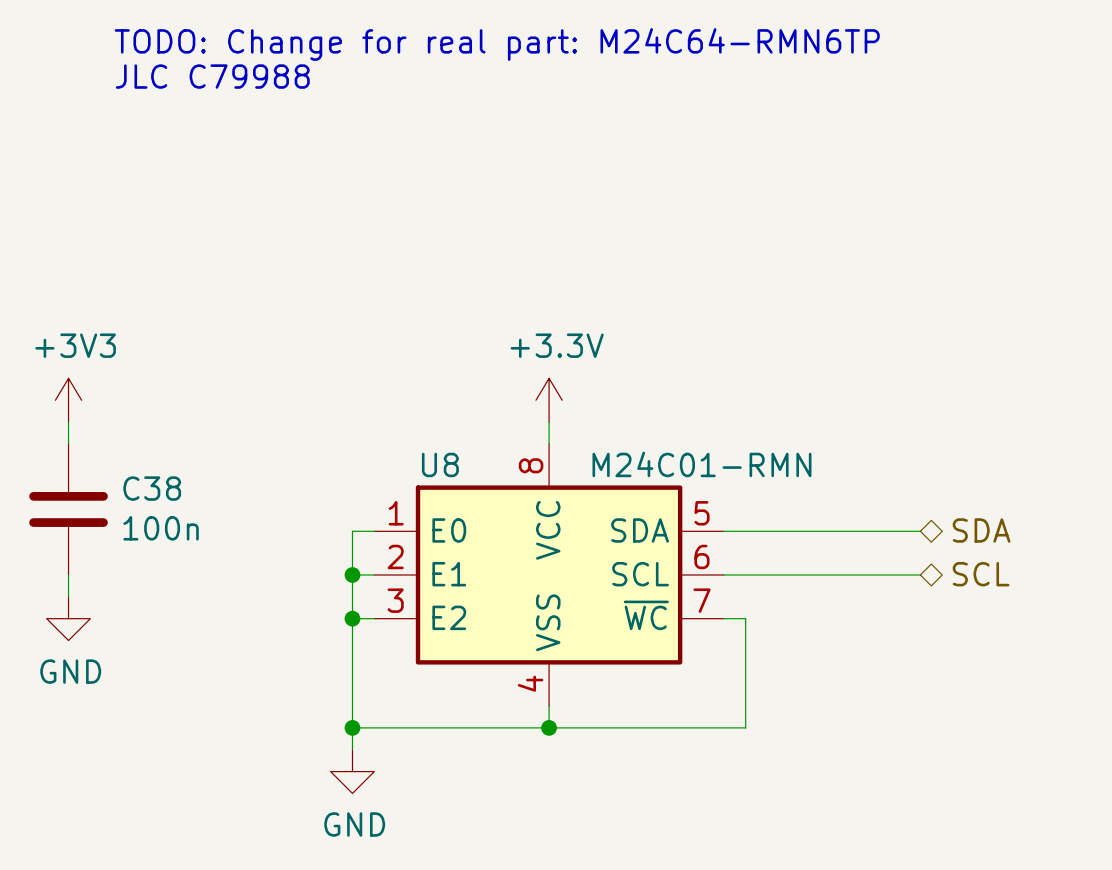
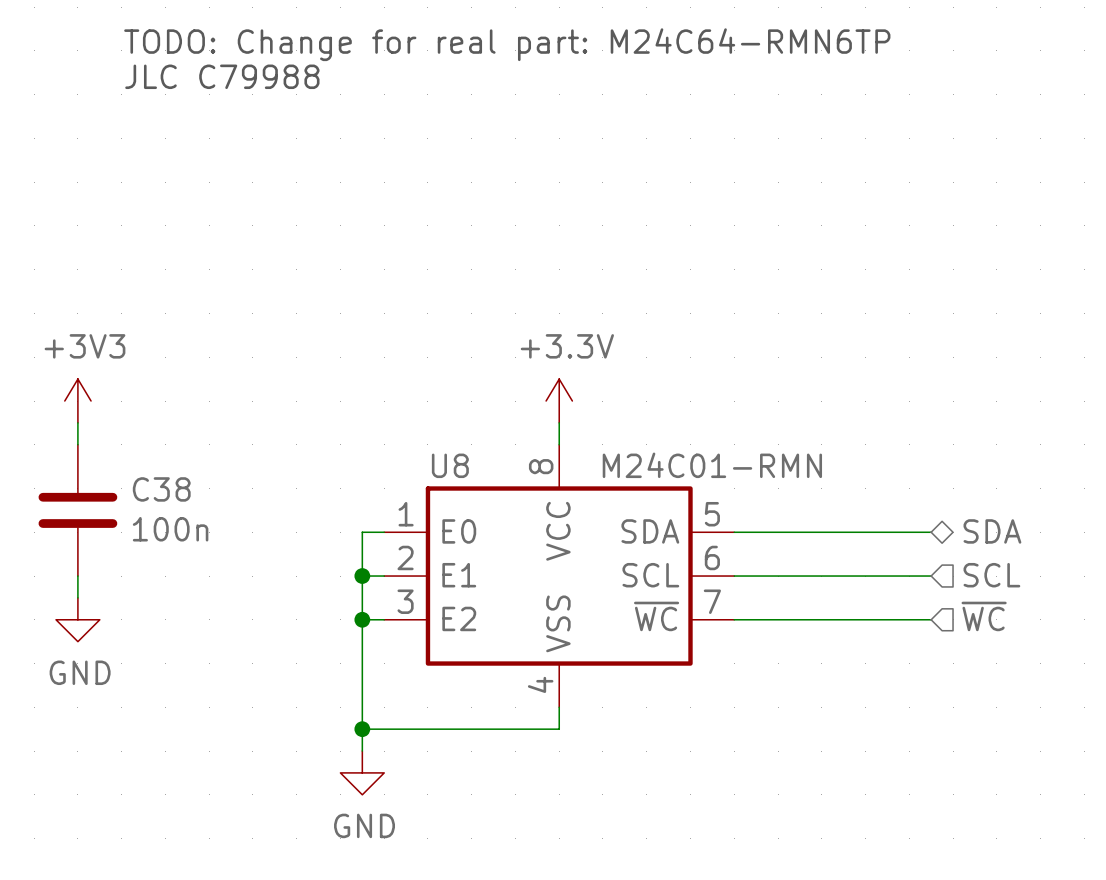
hierarchical label shape: bidirectional (981, 574) -> input (991, 575)
hierarchical label: none -> ~{WC} (984, 616)
wire: (745, 618) (745, 727) (549, 727) -> (756, 619) (931, 619)
junction: (549, 727) -> none

